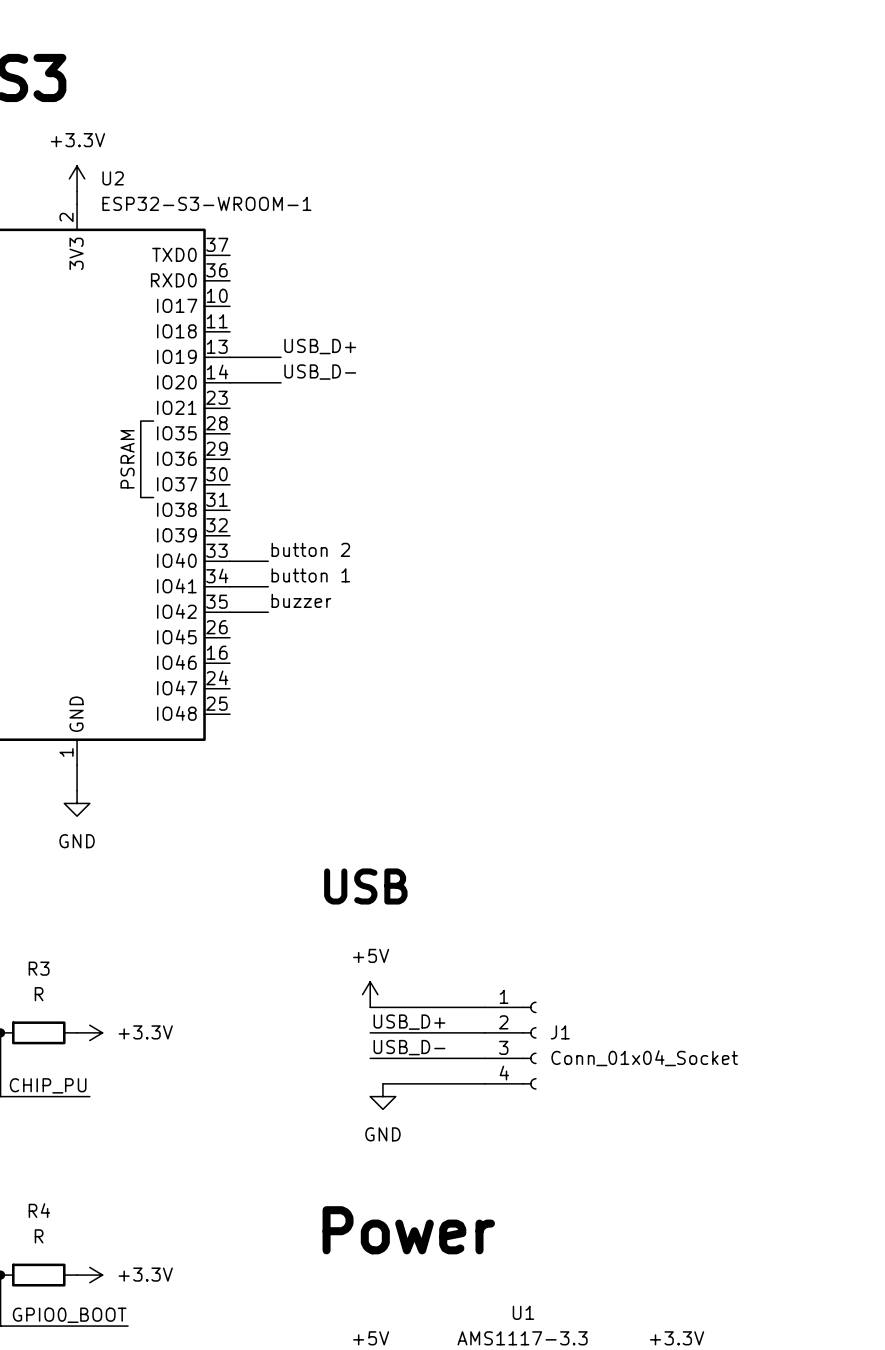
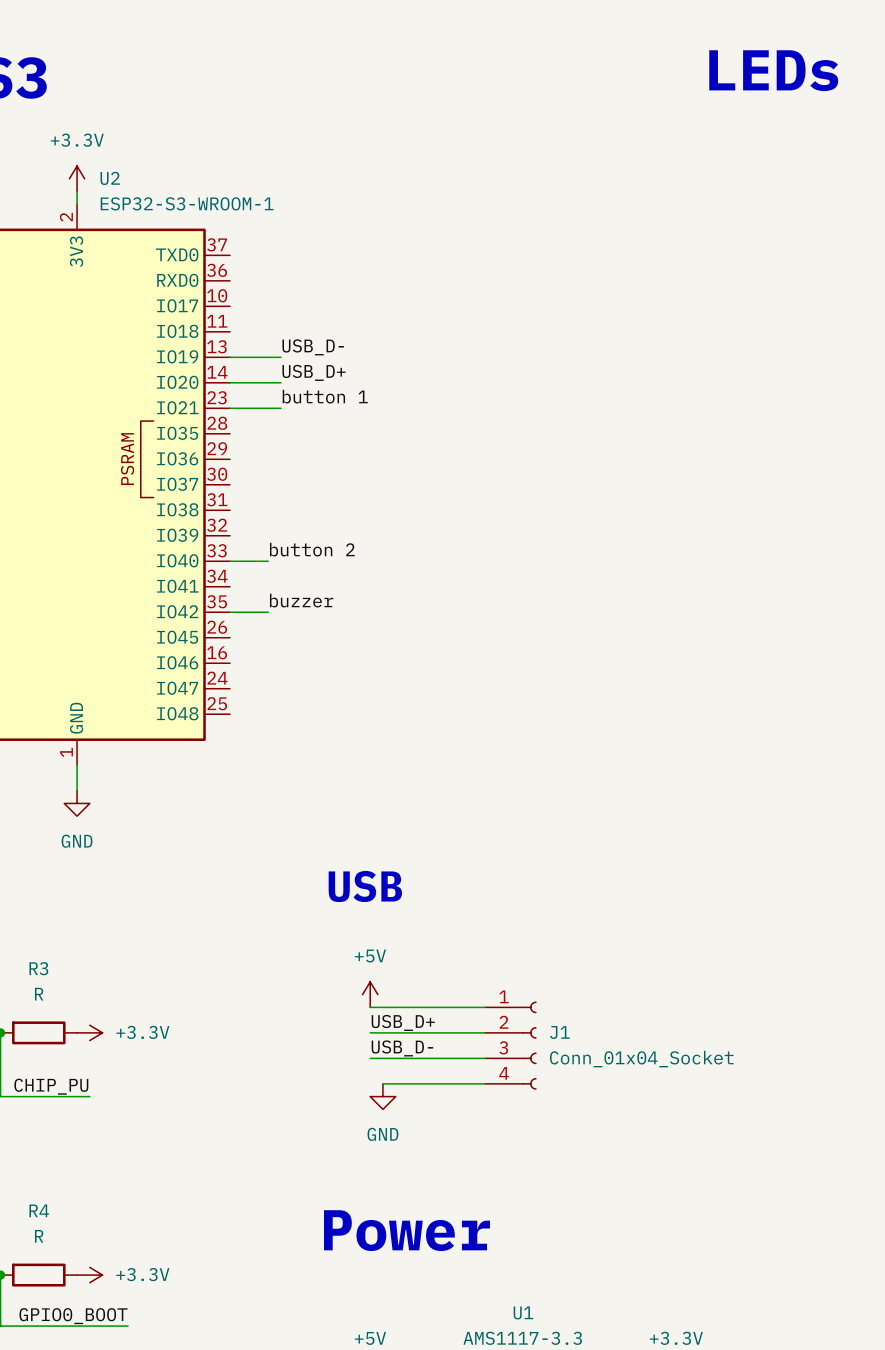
text: none -> LEDs (773, 70)
label: USB_D+ (320, 346) -> USB_D- (313, 347)
label: USB_D- (320, 372) -> USB_D+ (314, 372)
wire: none -> (230, 408) (280, 408)
label position: button 1 (310, 575) -> button 1 (325, 396)
wire: (230, 586) (268, 586) -> none

